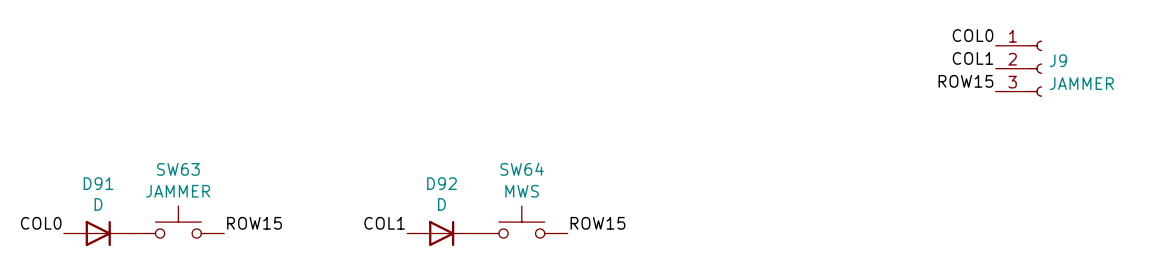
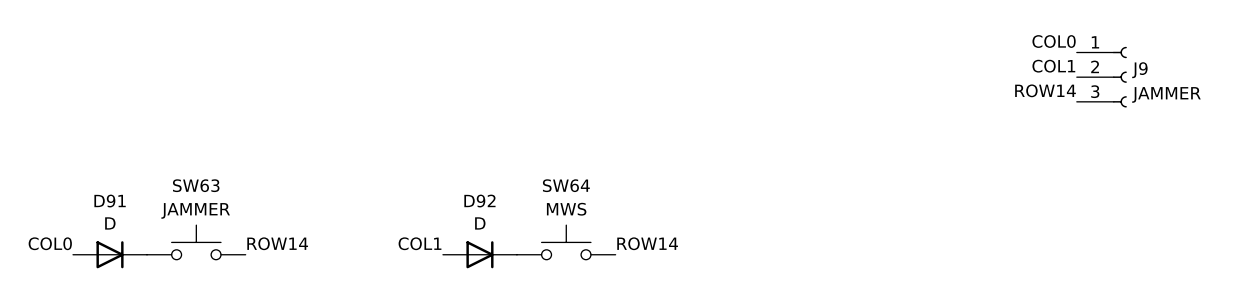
label: ROW15 (965, 81) -> ROW14 (1045, 90)
label: ROW15 (254, 223) -> ROW14 (277, 243)
label: ROW15 (597, 223) -> ROW14 (647, 243)

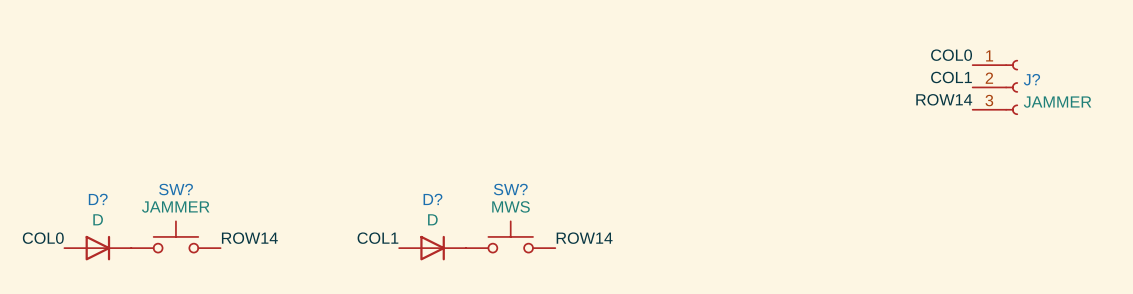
J9 name: J9 (1139, 70) -> J? (1031, 79)
SW63 name: SW63 (196, 185) -> SW? (176, 189)
SW64 name: SW64 (566, 185) -> SW? (510, 189)
D91 name: D91 (110, 201) -> D? (98, 199)
D92 name: D92 (479, 201) -> D? (432, 199)

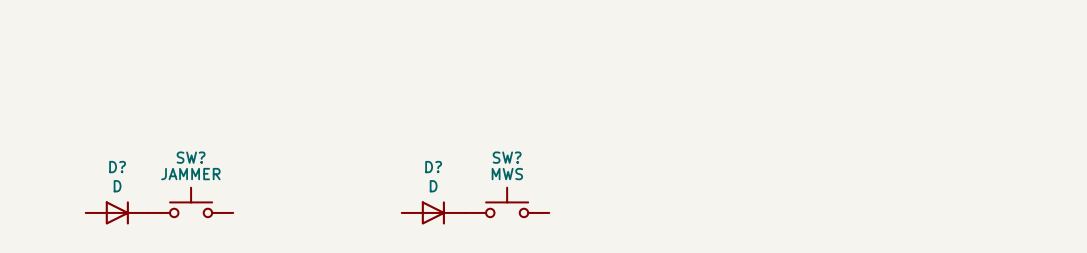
label: COL0 (951, 55) -> none
label: COL1 (951, 77) -> none
J?: JAMMER (995, 87) -> none
label: ROW14 (944, 99) -> none
label: COL0 (43, 238) -> none
label: ROW14 (249, 238) -> none
label: COL1 (377, 238) -> none
label: ROW14 (584, 238) -> none

